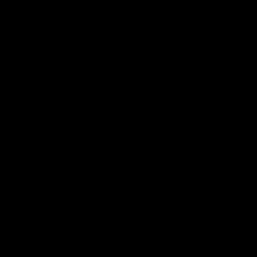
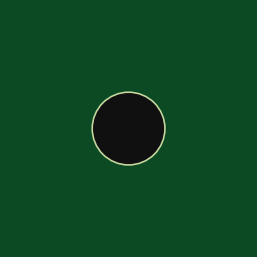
part: none -> (128, 128)

